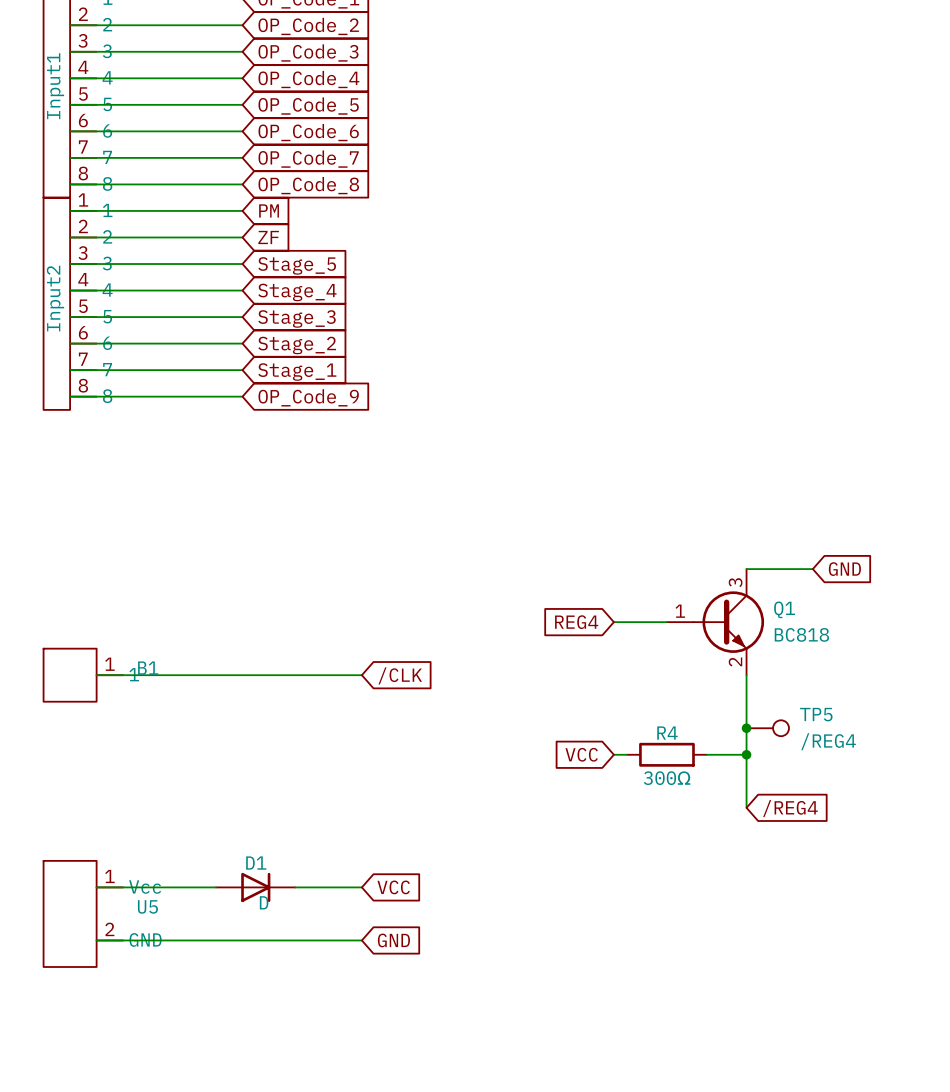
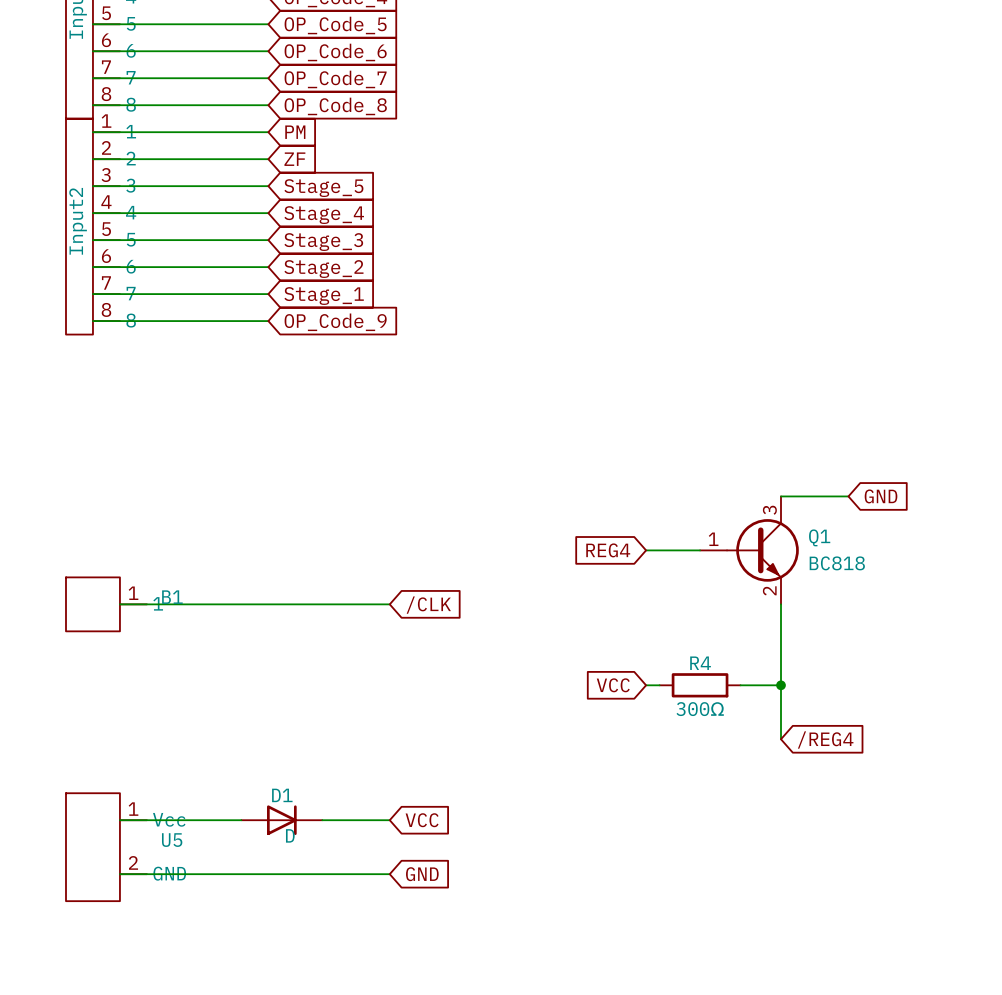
junction: (746, 728) -> none
TP5: /REG4 (767, 728) -> none

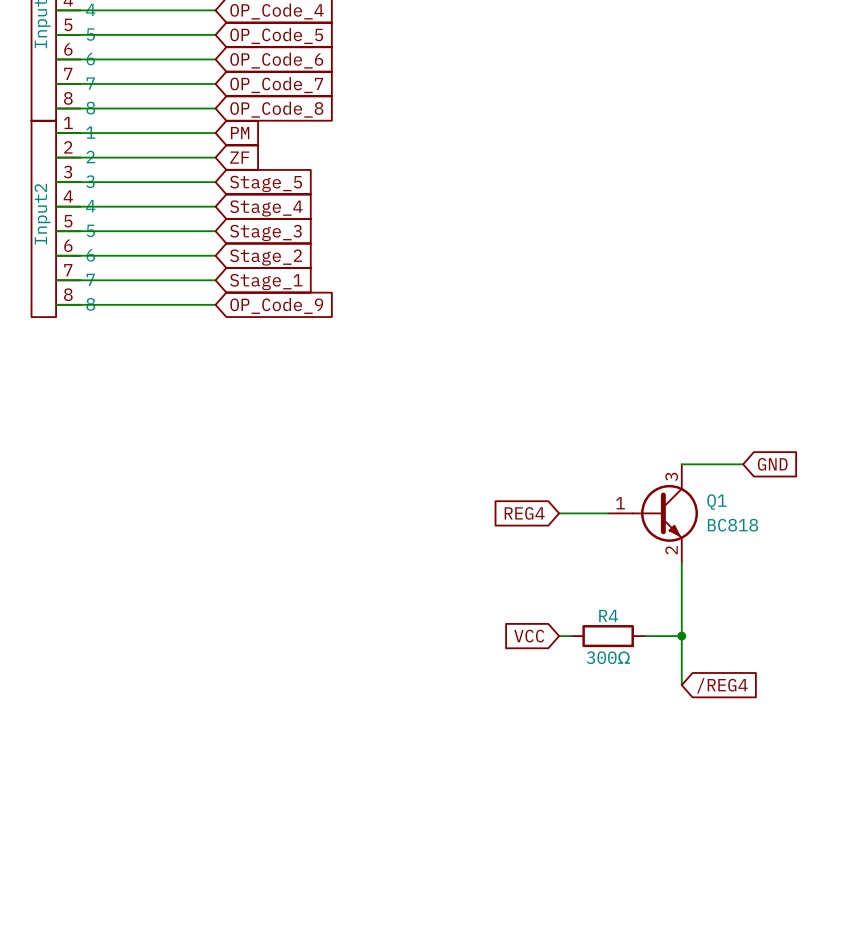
B1: (106, 604) -> none
wire: (119, 604) (389, 604) -> none
global label: /CLK (428, 605) -> none
wire: (119, 820) (241, 820) -> none
D1: D (281, 820) -> none
wire: (322, 820) (389, 820) -> none
global label: VCC (422, 820) -> none
U5: (106, 847) -> none
wire: (119, 874) (389, 874) -> none
global label: GND (422, 874) -> none

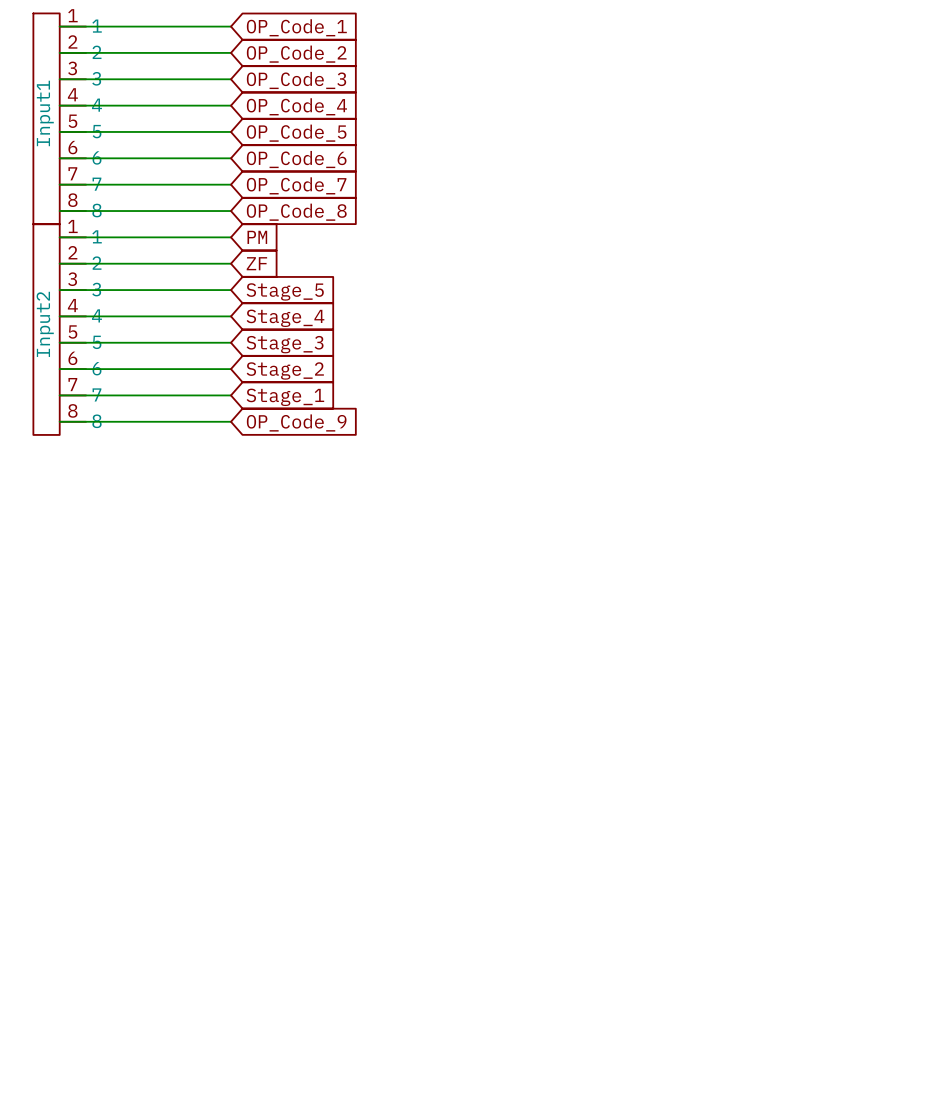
wire: (681, 464) (743, 464) -> none
global label: GND (772, 464) -> none
global label: REG4 (524, 513) -> none
wire: (559, 513) (608, 513) -> none
Q1: BC818 (653, 513) -> none
wire: (681, 562) (681, 685) -> none
global label: VCC (529, 636) -> none
wire: (559, 636) (571, 636) -> none
R4: 300Ω (608, 636) -> none
wire: (644, 636) (681, 636) -> none
junction: (681, 636) -> none
global label: /REG4 (722, 685) -> none

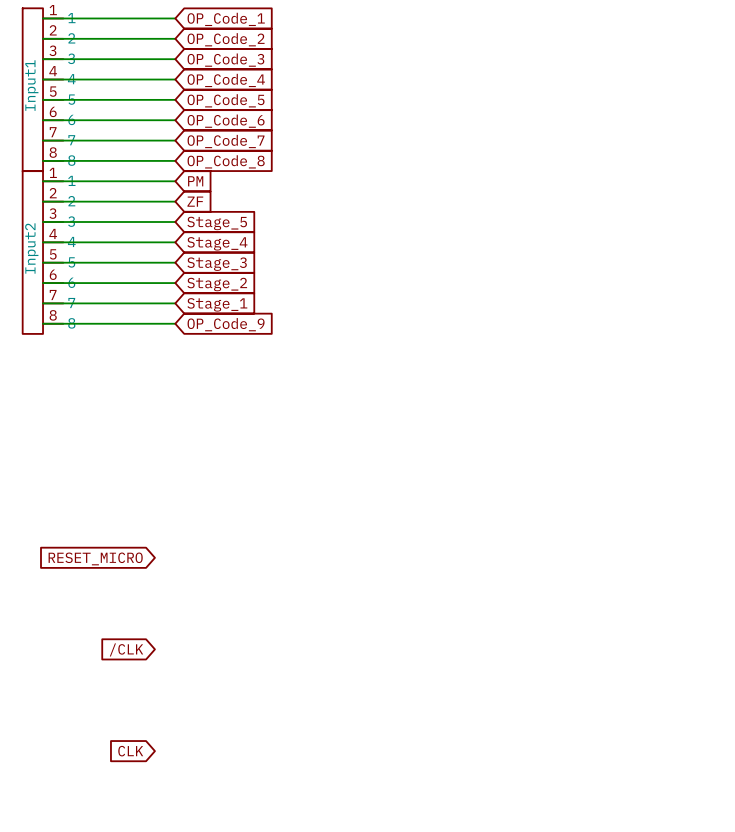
global label: none -> RESET_MICRO (95, 558)
global label: none -> /CLK (126, 649)
global label: none -> CLK (130, 751)

